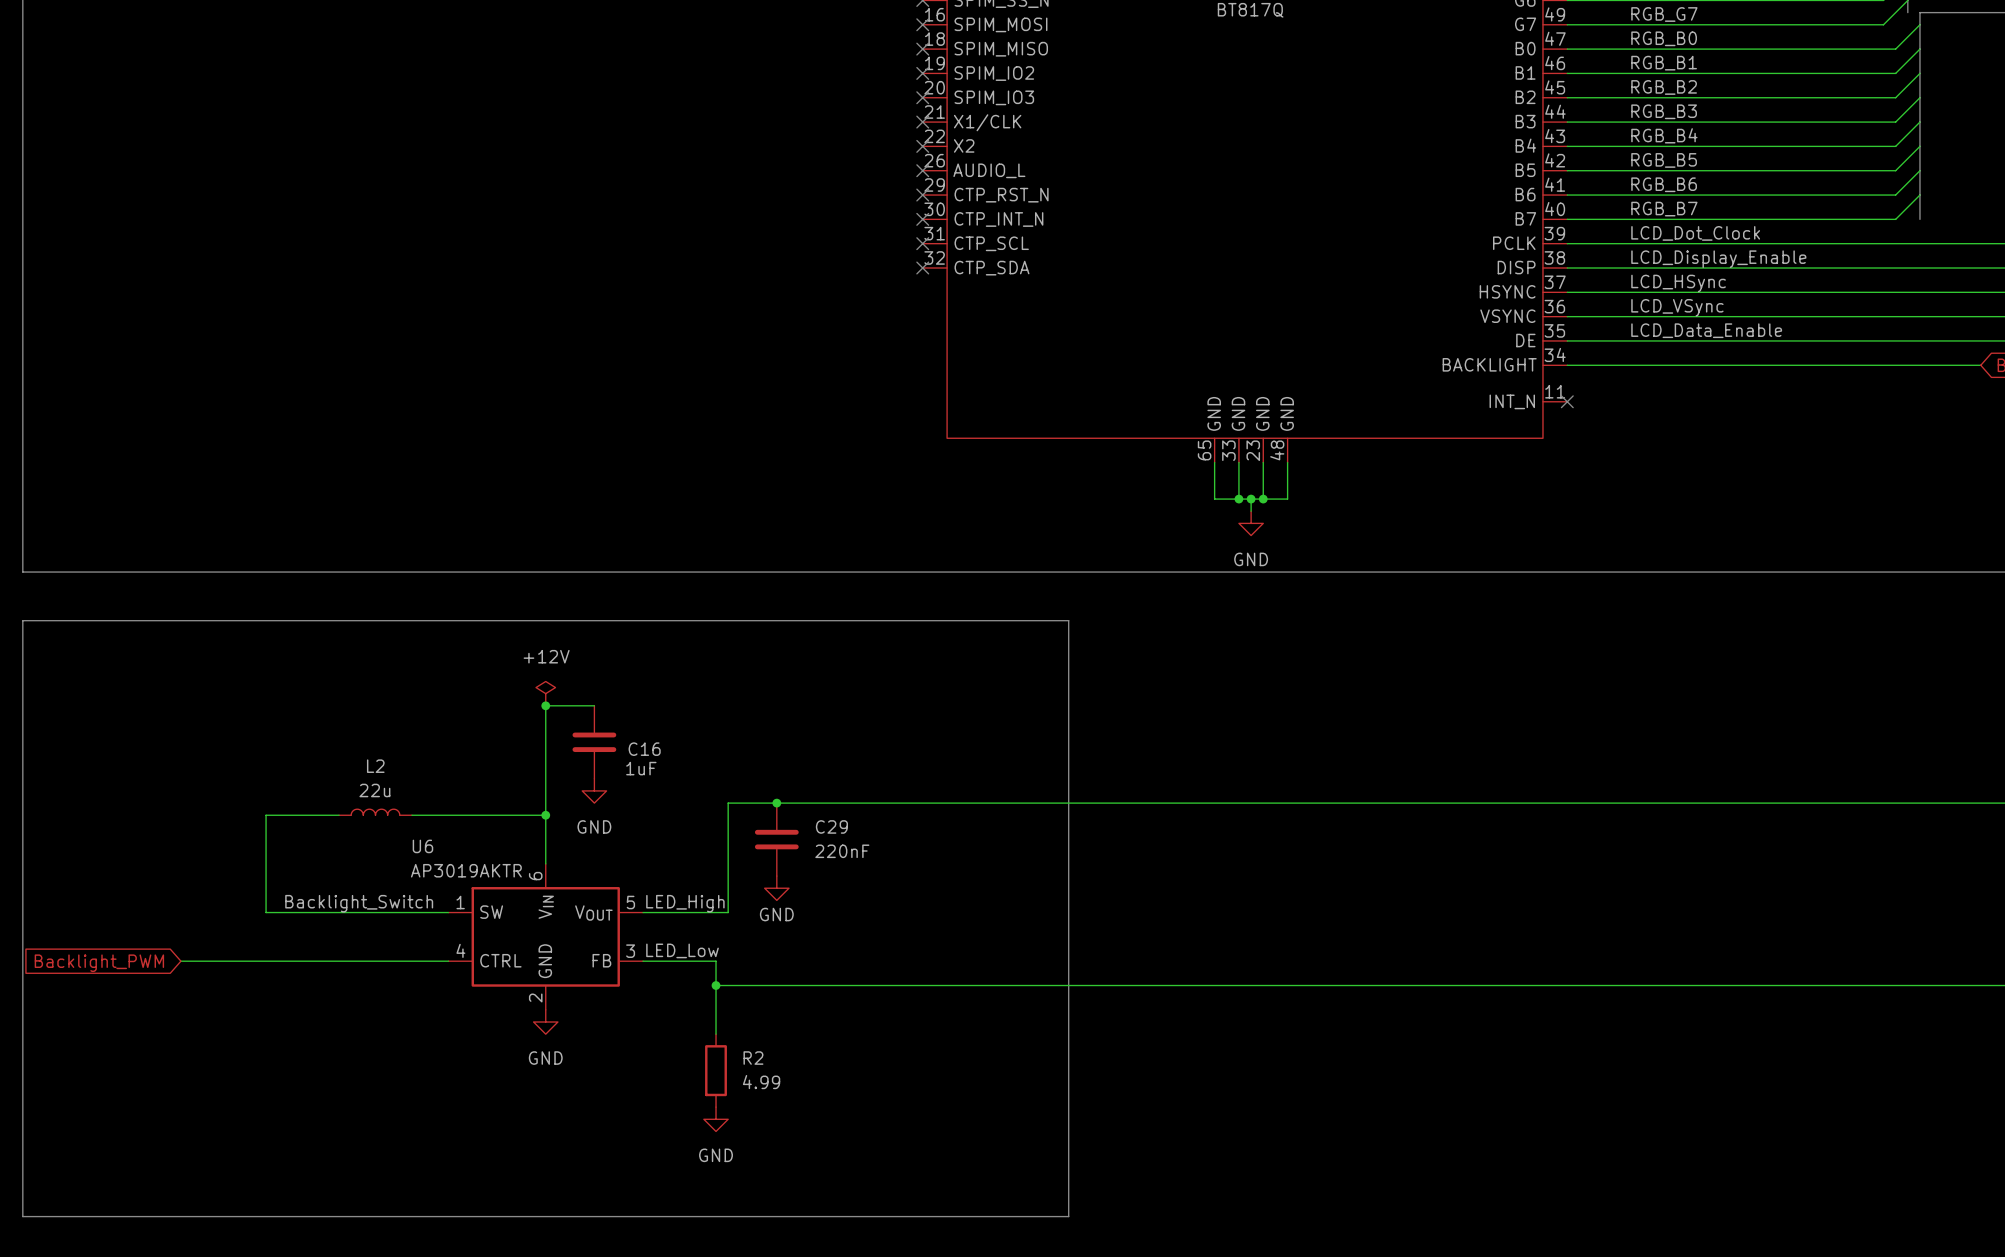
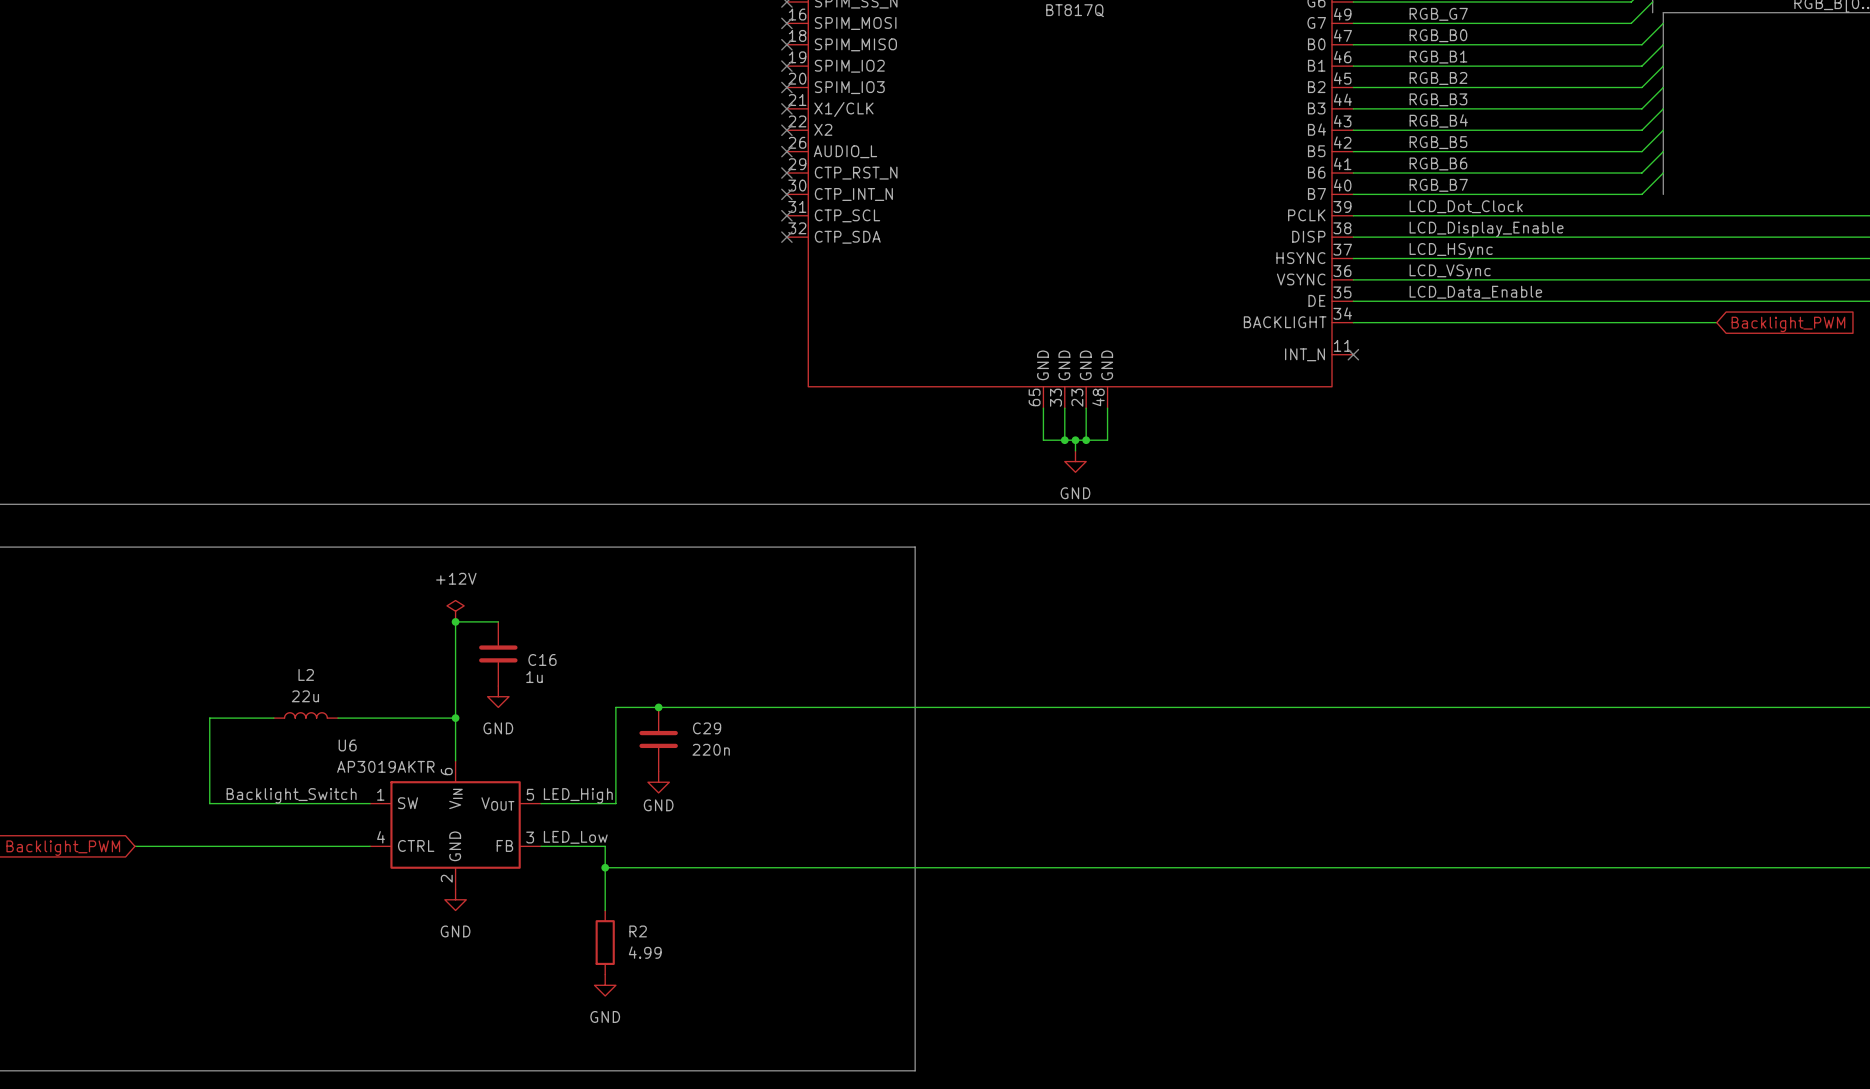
C16 value: 1uF (641, 768) -> 1u (534, 677)
C29 value: 220nF (842, 851) -> 220n (711, 749)

